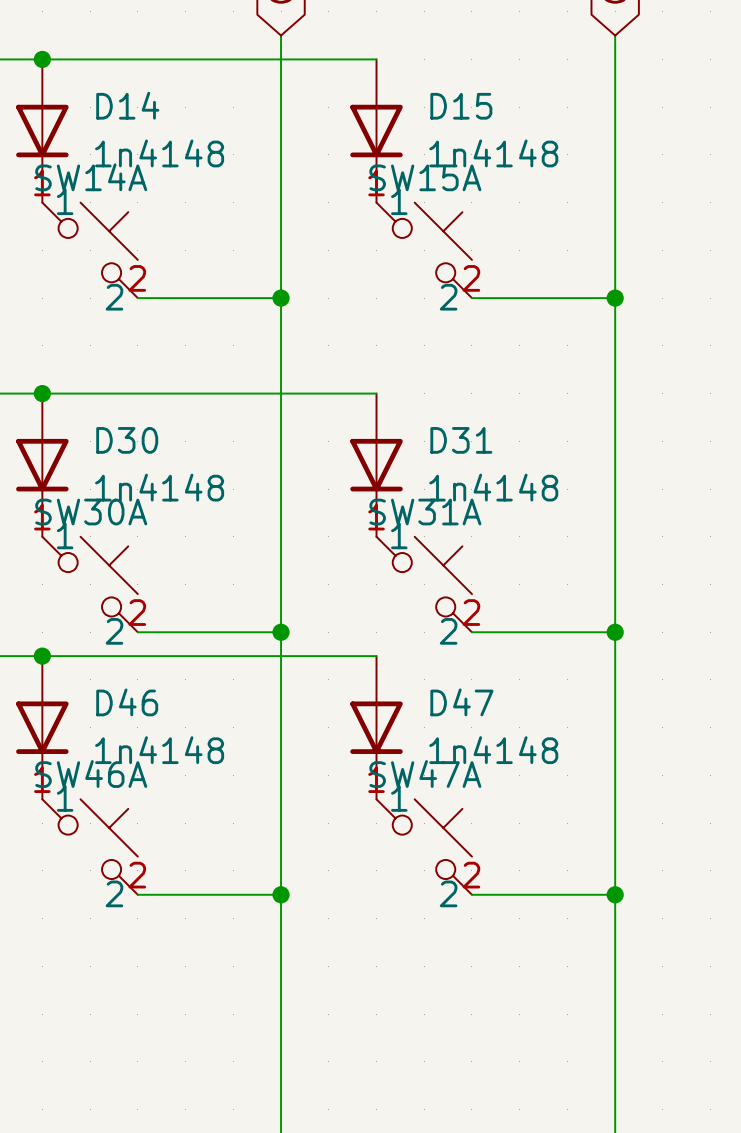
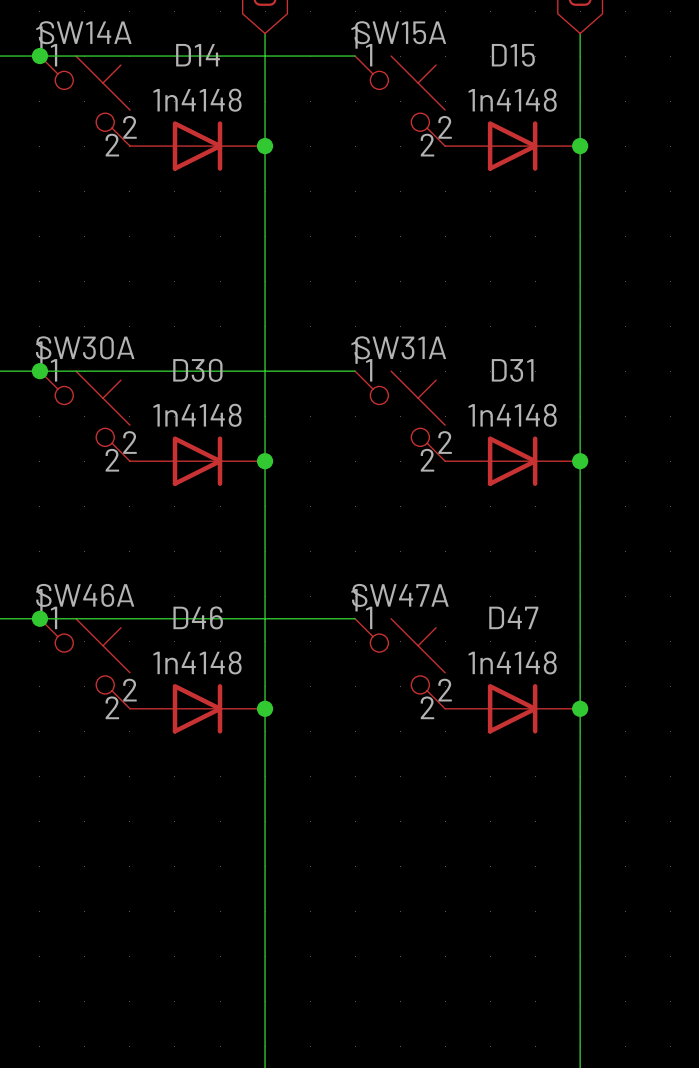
D14 rotation: 0° (42, 131) -> 90° counterclockwise (197, 146)
D14 position: (42, 131) -> (197, 146)
D15 rotation: 0° (376, 131) -> 90° counterclockwise (512, 146)
D15 position: (376, 131) -> (512, 146)
D14 value position: 1n4148 (159, 153) -> 1n4148 (197, 100)
D15 value position: 1n4148 (493, 153) -> 1n4148 (512, 100)
junction: none -> (265, 146)
junction: none -> (580, 146)
SW14A position: (90, 250) -> (84, 101)
SW15A position: (424, 250) -> (400, 101)
wire: (137, 298) (281, 298) -> none
junction: (281, 298) -> none
wire: (471, 298) (615, 298) -> none
junction: (615, 298) -> none
D30 rotation: 0° (42, 465) -> 90° counterclockwise (197, 461)
D30 position: (42, 465) -> (197, 461)
D31 rotation: 0° (376, 465) -> 90° counterclockwise (512, 461)
D31 position: (376, 465) -> (512, 461)
D30 value position: 1n4148 (159, 487) -> 1n4148 (197, 415)
D31 value position: 1n4148 (493, 487) -> 1n4148 (512, 415)
junction: none -> (265, 461)
junction: none -> (580, 461)
SW30A position: (90, 584) -> (84, 416)
SW31A position: (424, 584) -> (400, 416)
wire: (137, 632) (281, 632) -> none
junction: (281, 632) -> none
wire: (471, 632) (615, 632) -> none
junction: (615, 632) -> none
D46 rotation: 0° (42, 727) -> 90° counterclockwise (197, 708)
D46 position: (42, 727) -> (197, 708)
D47 rotation: 0° (376, 727) -> 90° counterclockwise (512, 708)
D47 position: (376, 727) -> (512, 708)
D46 value position: 1n4148 (159, 750) -> 1n4148 (197, 662)
D47 value position: 1n4148 (493, 750) -> 1n4148 (512, 662)
junction: none -> (265, 708)
junction: none -> (580, 708)
SW46A position: (90, 847) -> (84, 663)
SW47A position: (424, 847) -> (400, 663)
wire: (137, 894) (281, 894) -> none
junction: (281, 894) -> none
wire: (471, 894) (615, 894) -> none
junction: (615, 894) -> none

